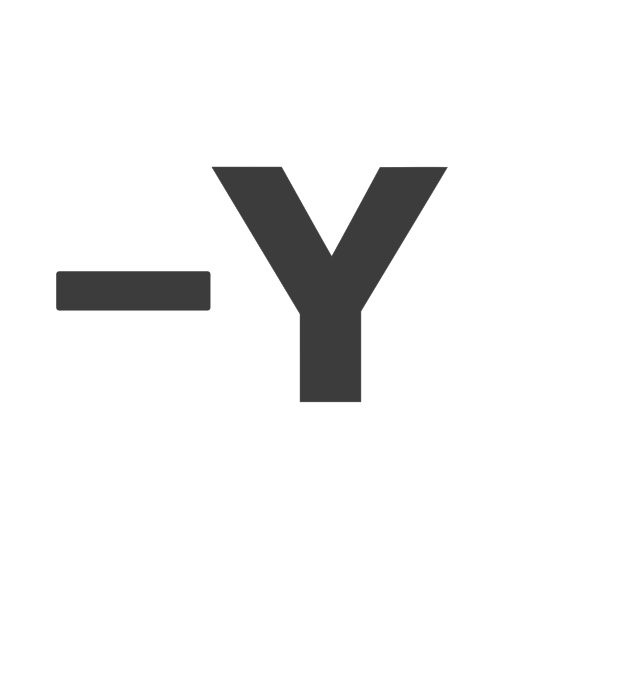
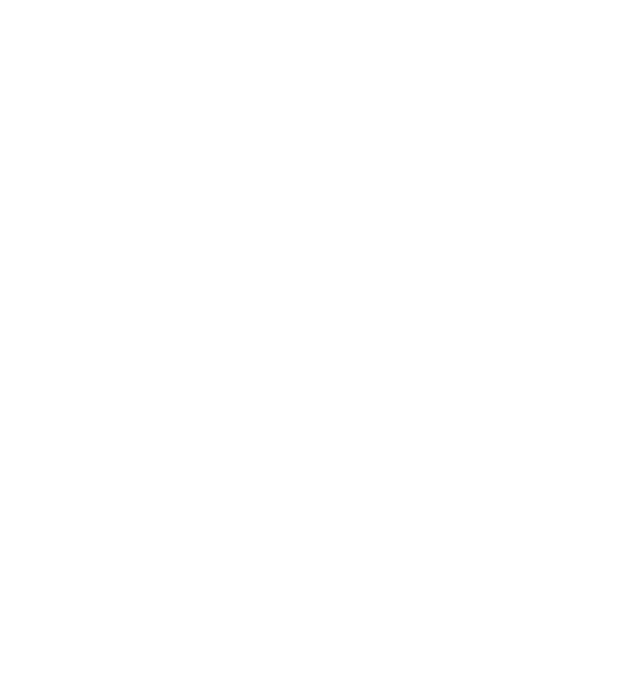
drawing: [56, 166, 448, 403] -> none

